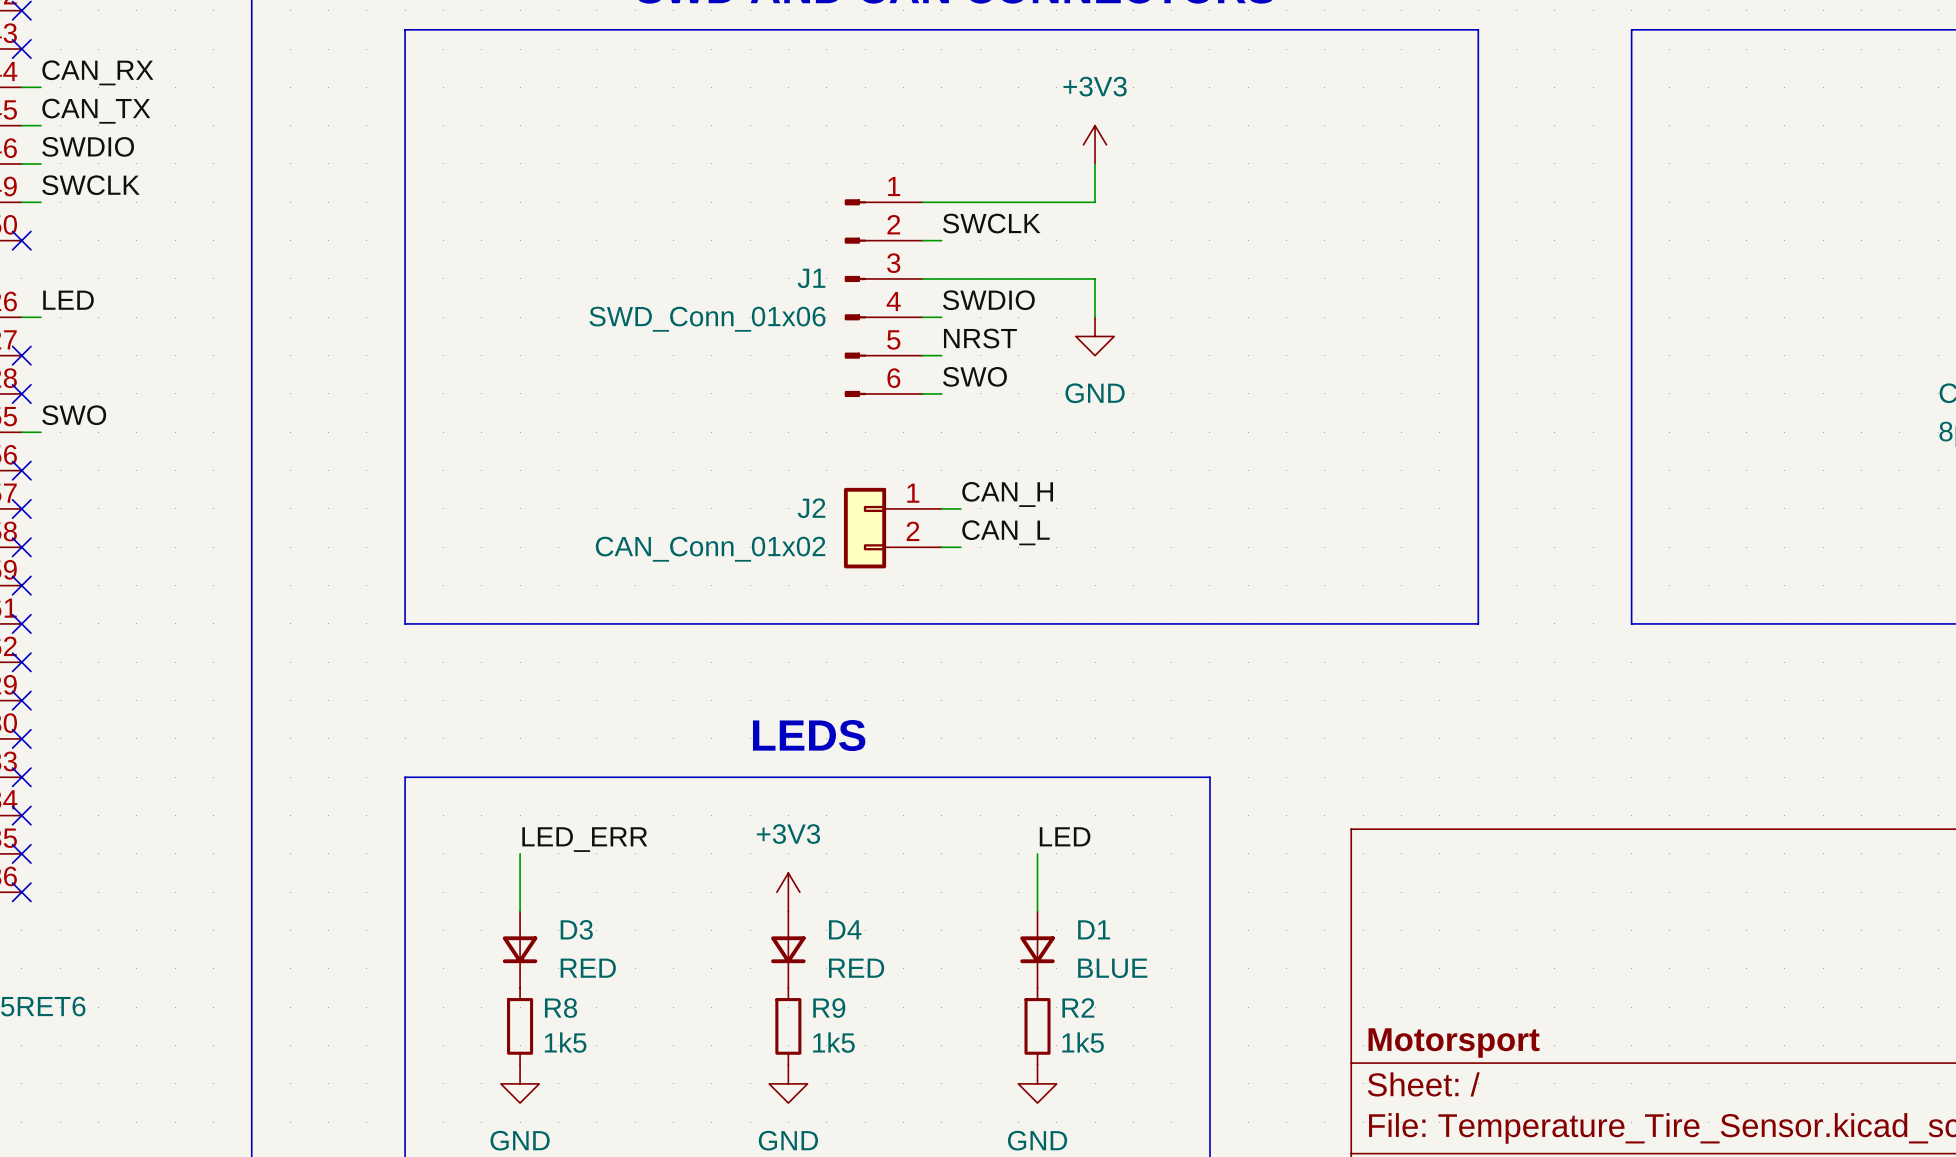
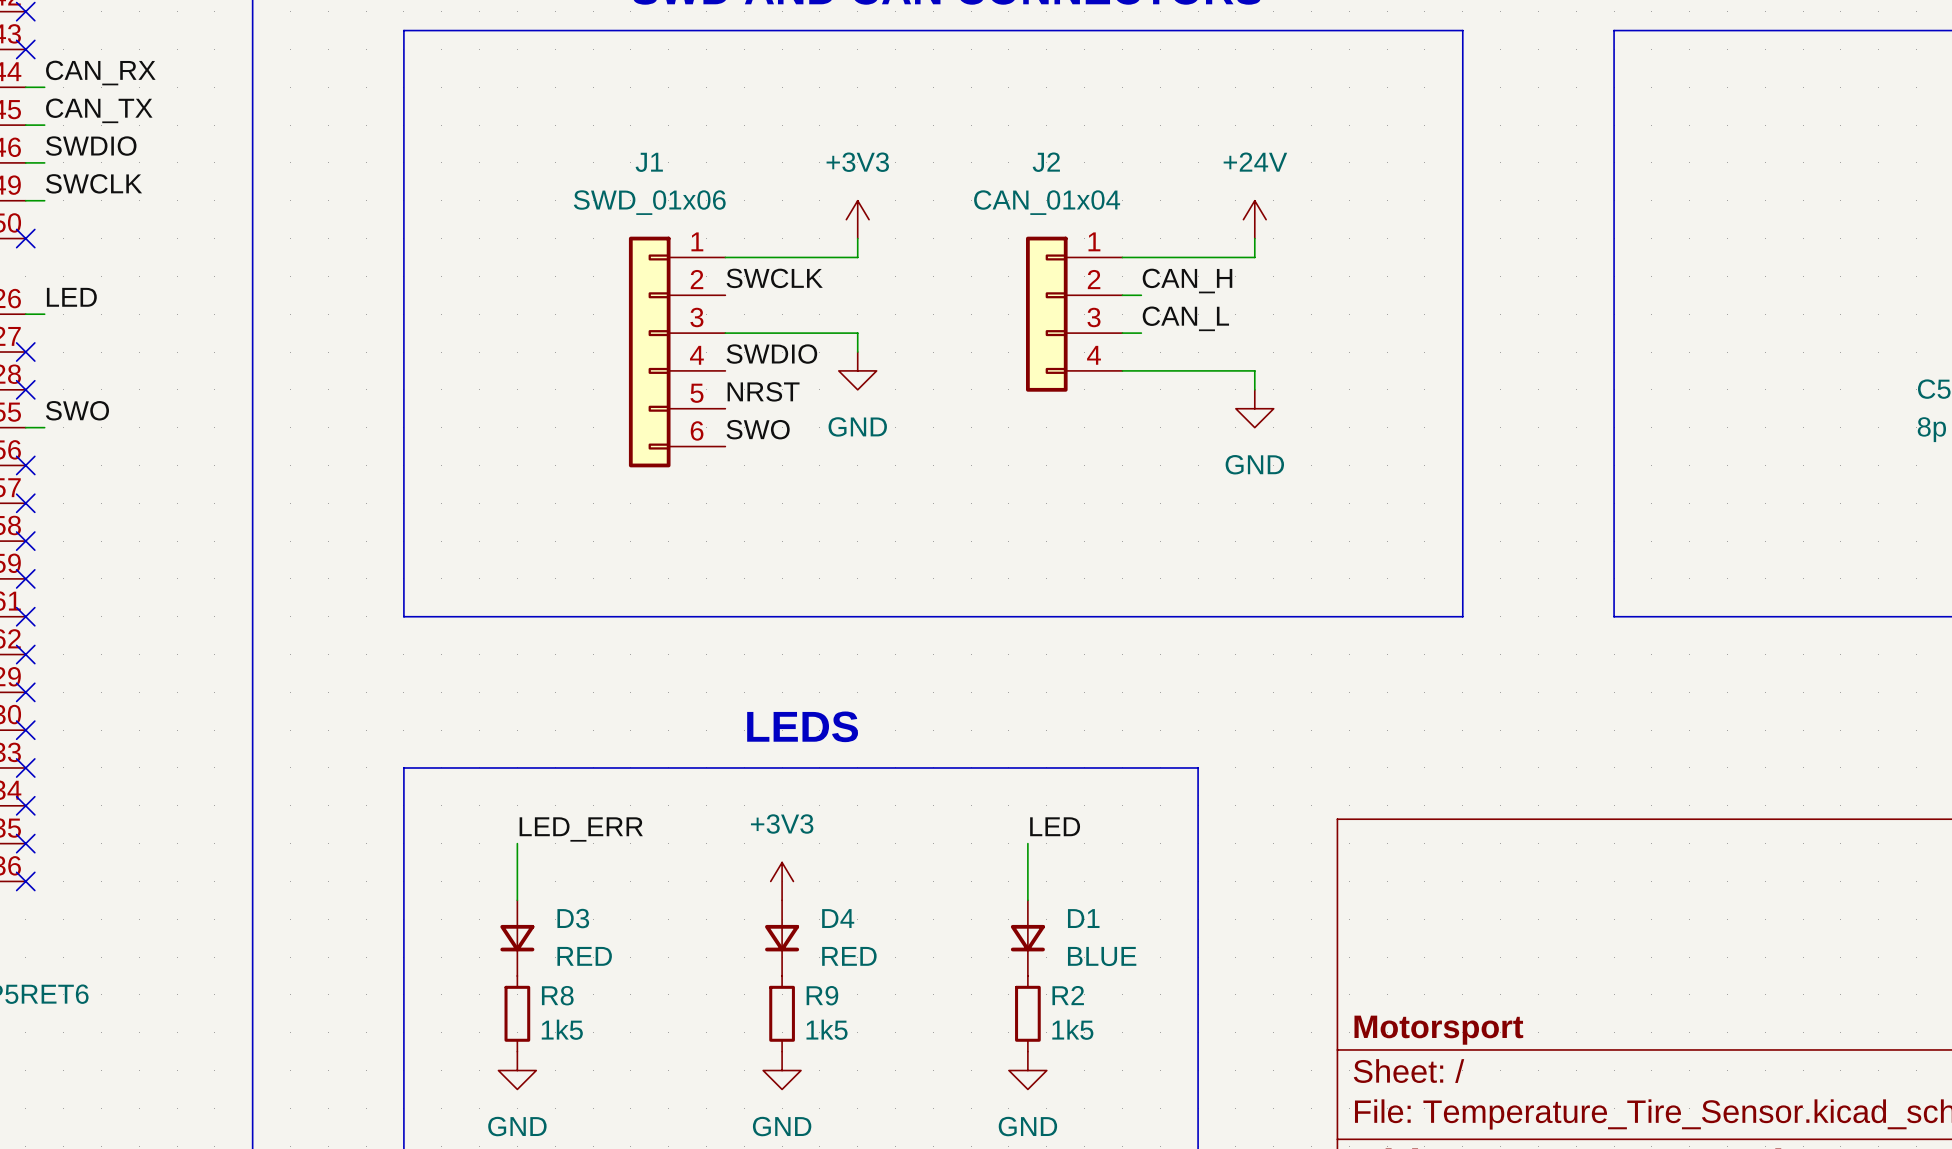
power symbol position: +3V3 (1095, 144) -> +3V3 (857, 219)
wire: (1095, 163) (1095, 202) (922, 202) -> none
J1 symbol: [844, 199, 923, 398] -> [628, 236, 726, 468]
power symbol: none -> +24V (1254, 219)
label position: SWCLK (991, 223) -> SWCLK (774, 278)
wire: none -> (857, 238) (857, 257) (725, 257)
wire: (922, 240) (941, 240) -> none
wire: none -> (1254, 238) (1254, 257) (1122, 257)
J1 name position: J1 (811, 278) -> J1 (649, 162)
wire: (922, 278) (1095, 278) (1095, 317) -> none
label position: SWDIO (988, 300) -> SWDIO (771, 354)
wire: (922, 317) (941, 317) -> (1122, 295) (1141, 295)
J1 value: SWD_Conn_01x06 (707, 319) -> SWD_01x06 (649, 202)
wire: none -> (725, 333) (857, 333) (857, 352)
power symbol: GND (1095, 336) -> none
label position: NRST (980, 338) -> NRST (763, 391)
wire: (922, 355) (941, 355) -> (1122, 333) (1141, 333)
power symbol: none -> GND (857, 370)
wire: none -> (1122, 370) (1254, 370) (1254, 389)
label position: SWO (974, 376) -> SWO (758, 429)
wire: (922, 393) (941, 393) -> none
power symbol: none -> GND (1254, 408)
J2 symbol: [843, 487, 942, 569] -> [1026, 236, 1123, 392]
label position: CAN_H (1007, 494) -> CAN_H (1187, 281)
J2 name position: J2 (811, 508) -> J2 (1046, 162)
wire: (941, 508) (960, 508) -> none
label position: CAN_L (1005, 532) -> CAN_L (1185, 318)
wire: (941, 547) (960, 547) -> none
J2 value: CAN_Conn_01x02 (710, 549) -> CAN_01x04 (1047, 202)

